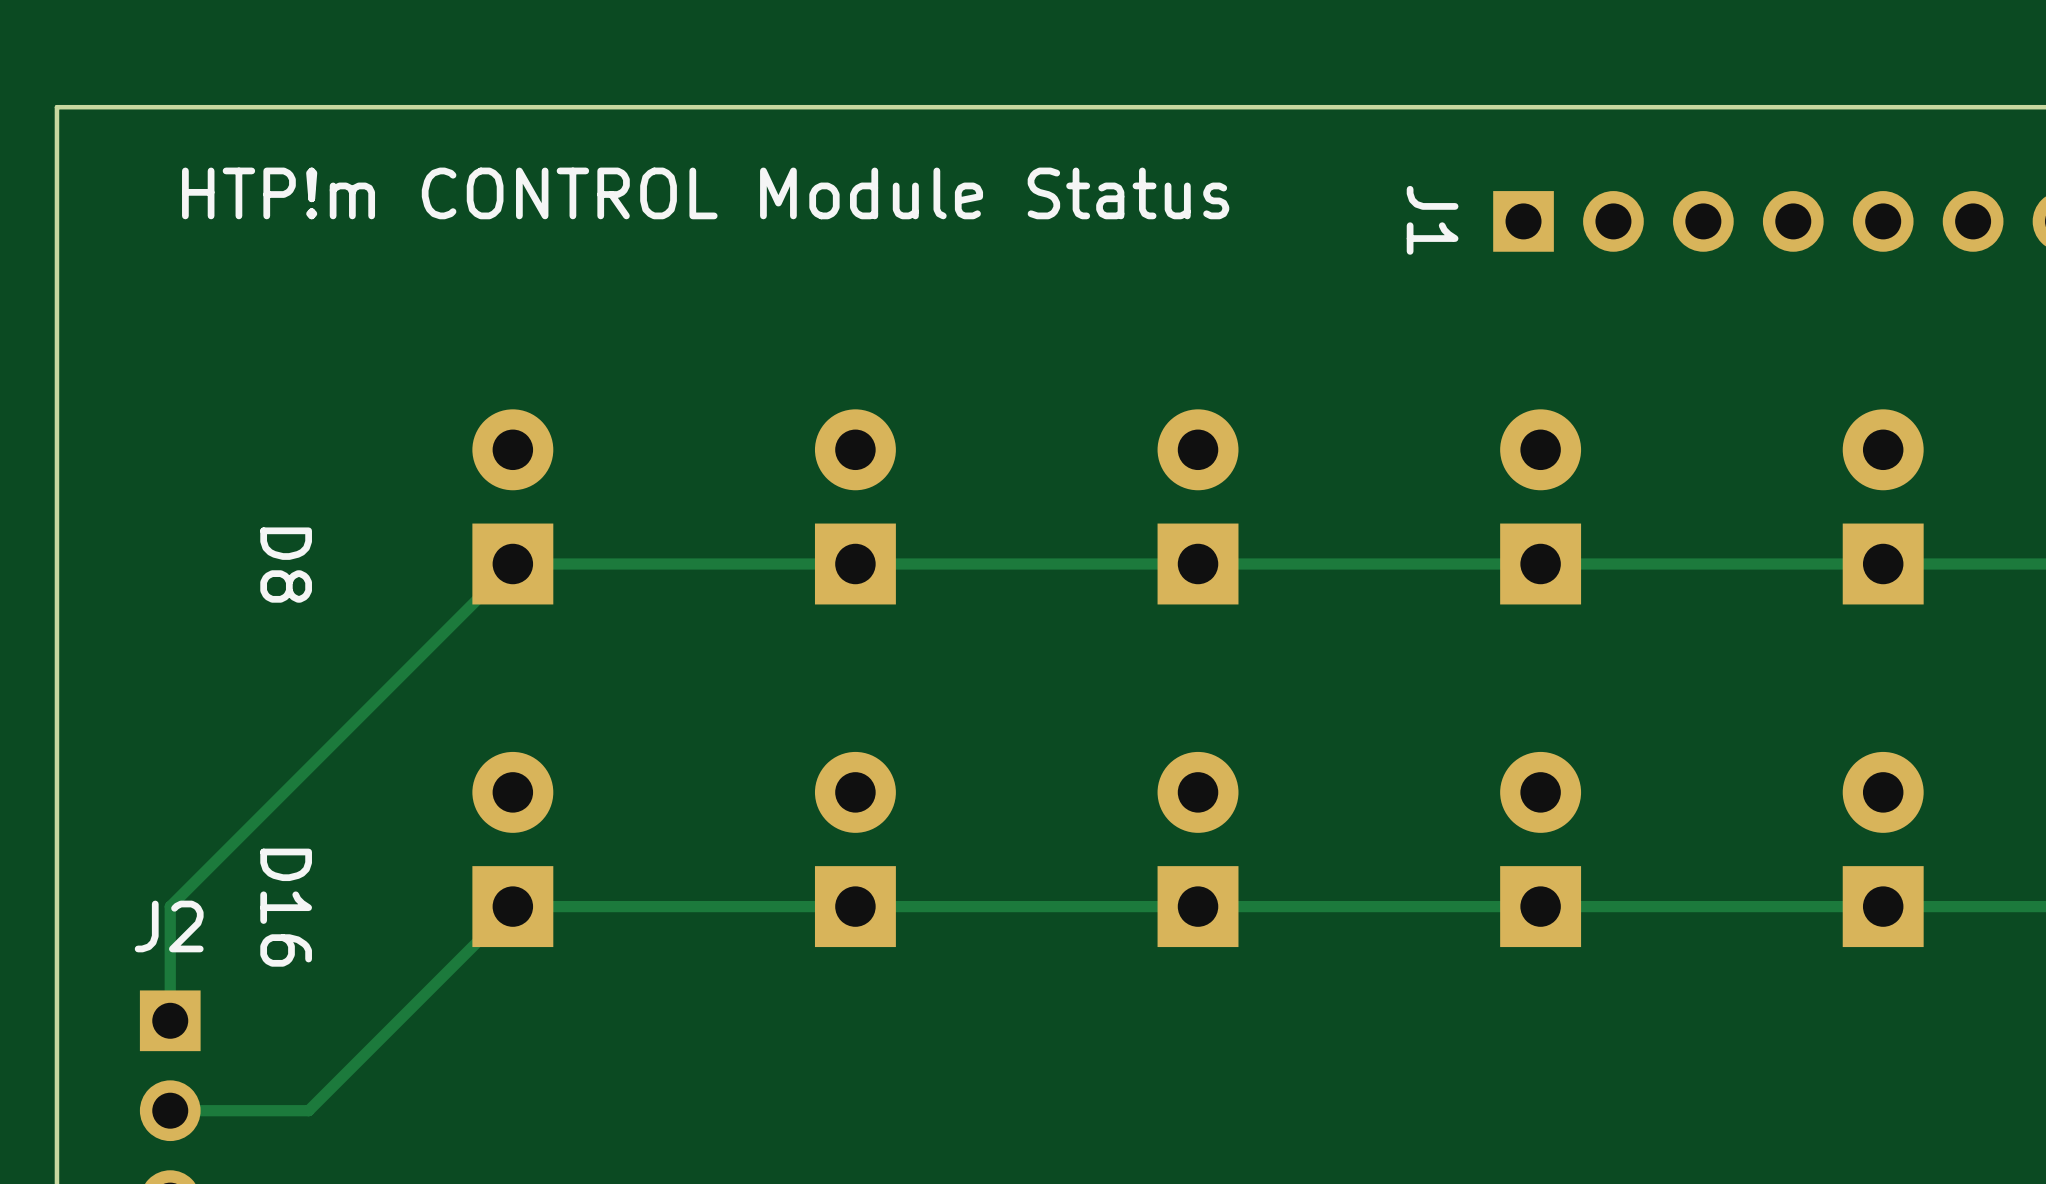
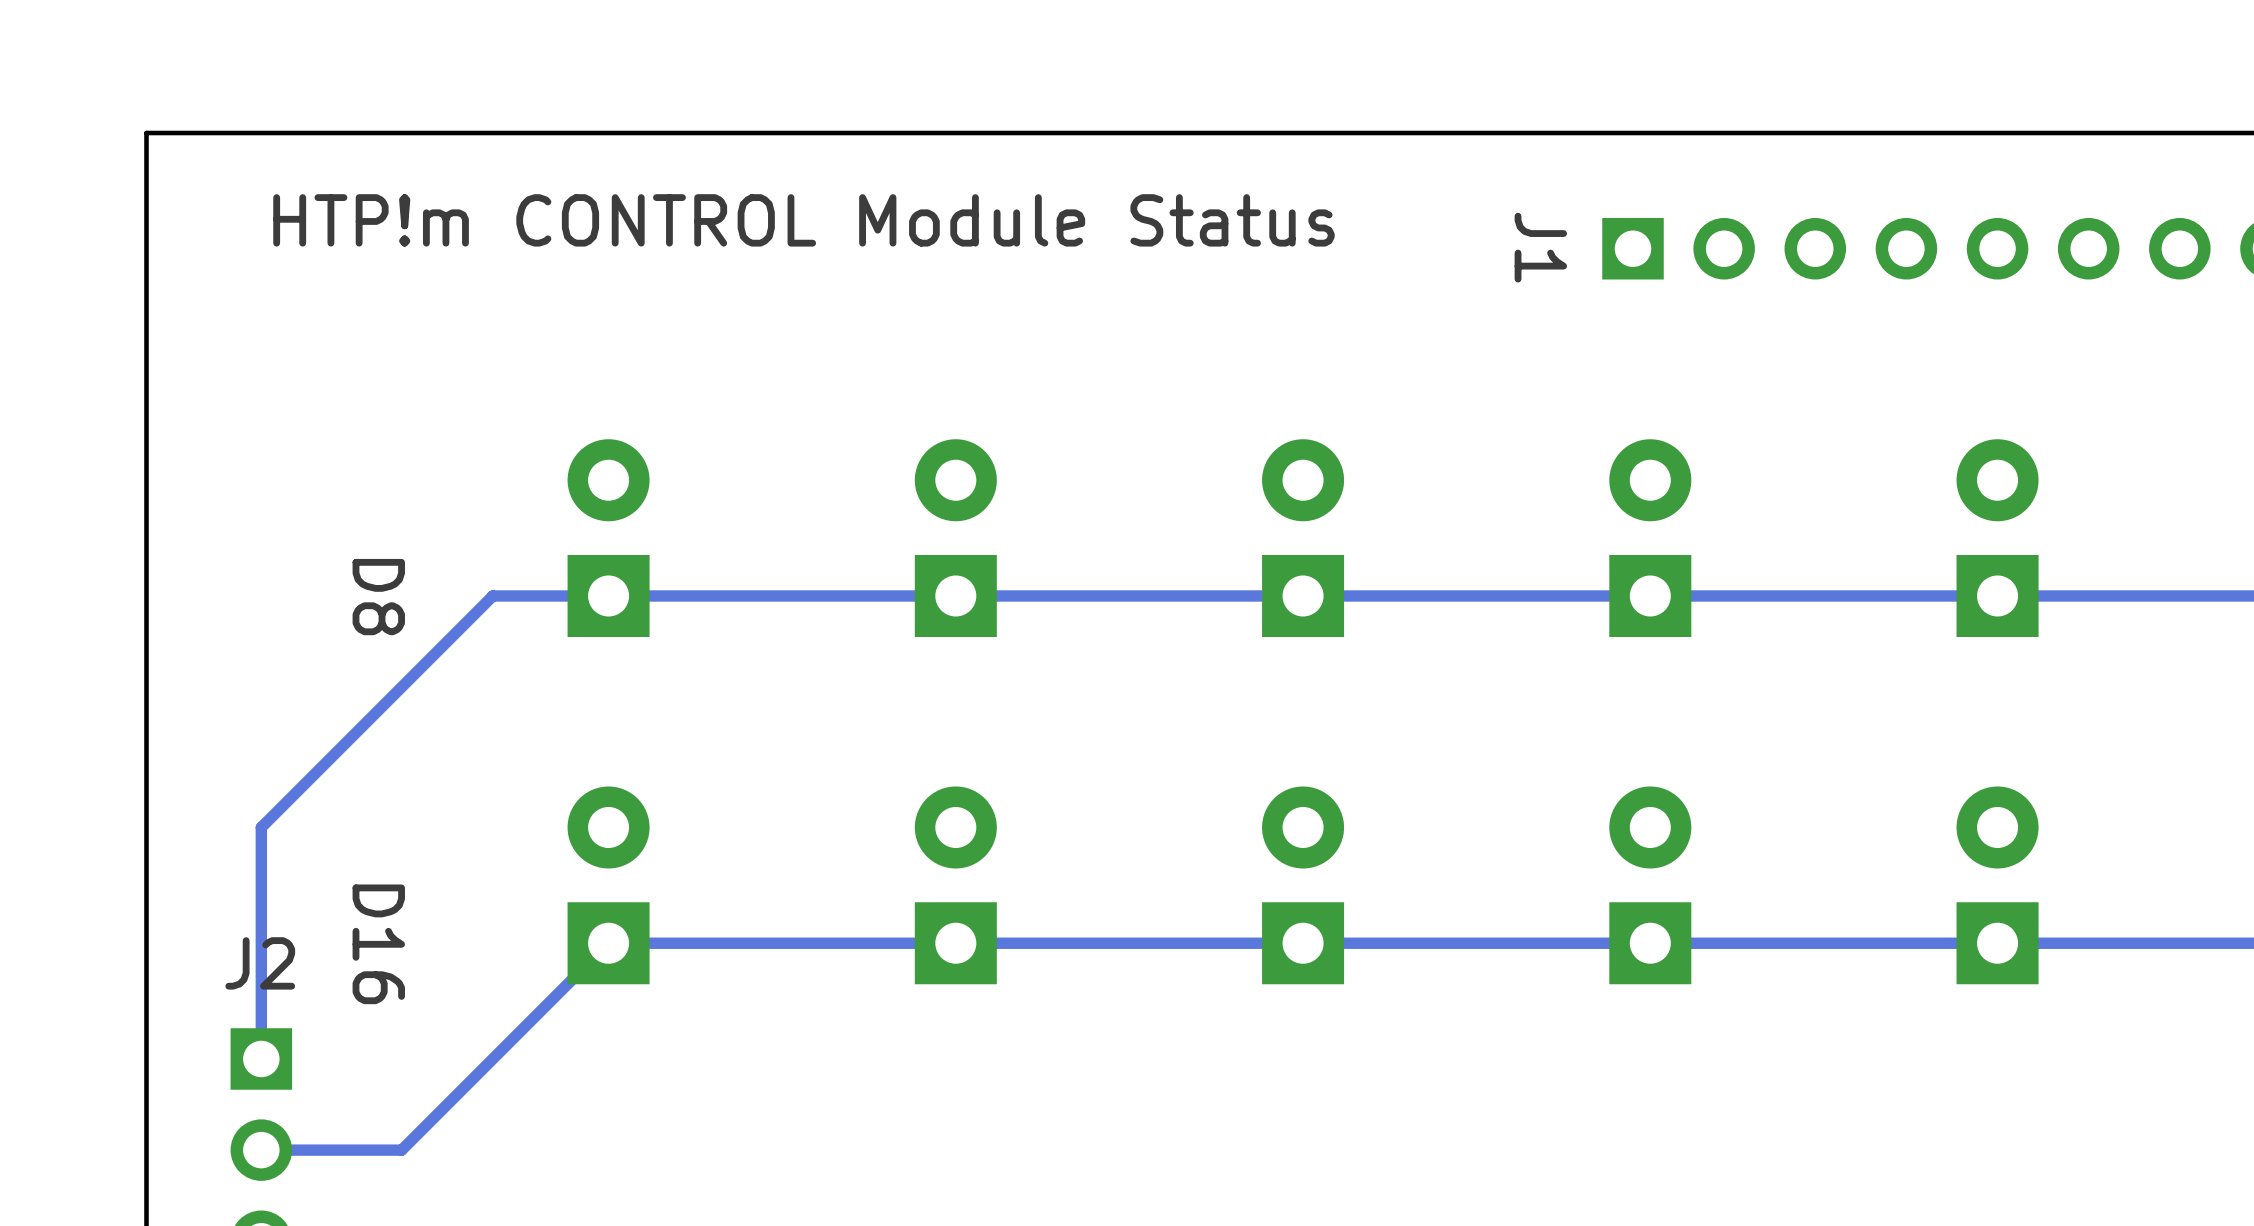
track: (512, 564) (170, 906) -> (608, 595) (492, 595) (261, 827) (261, 943)

